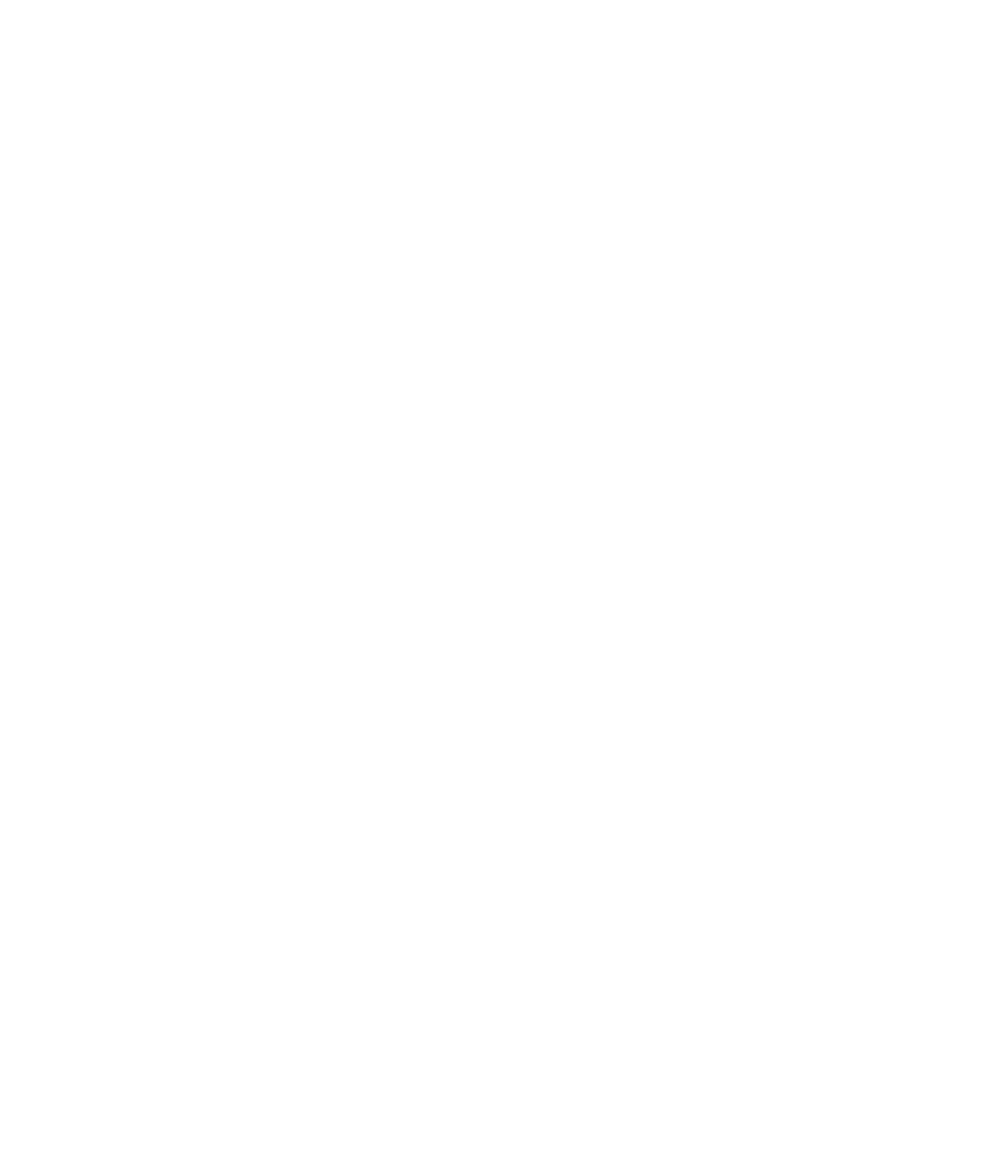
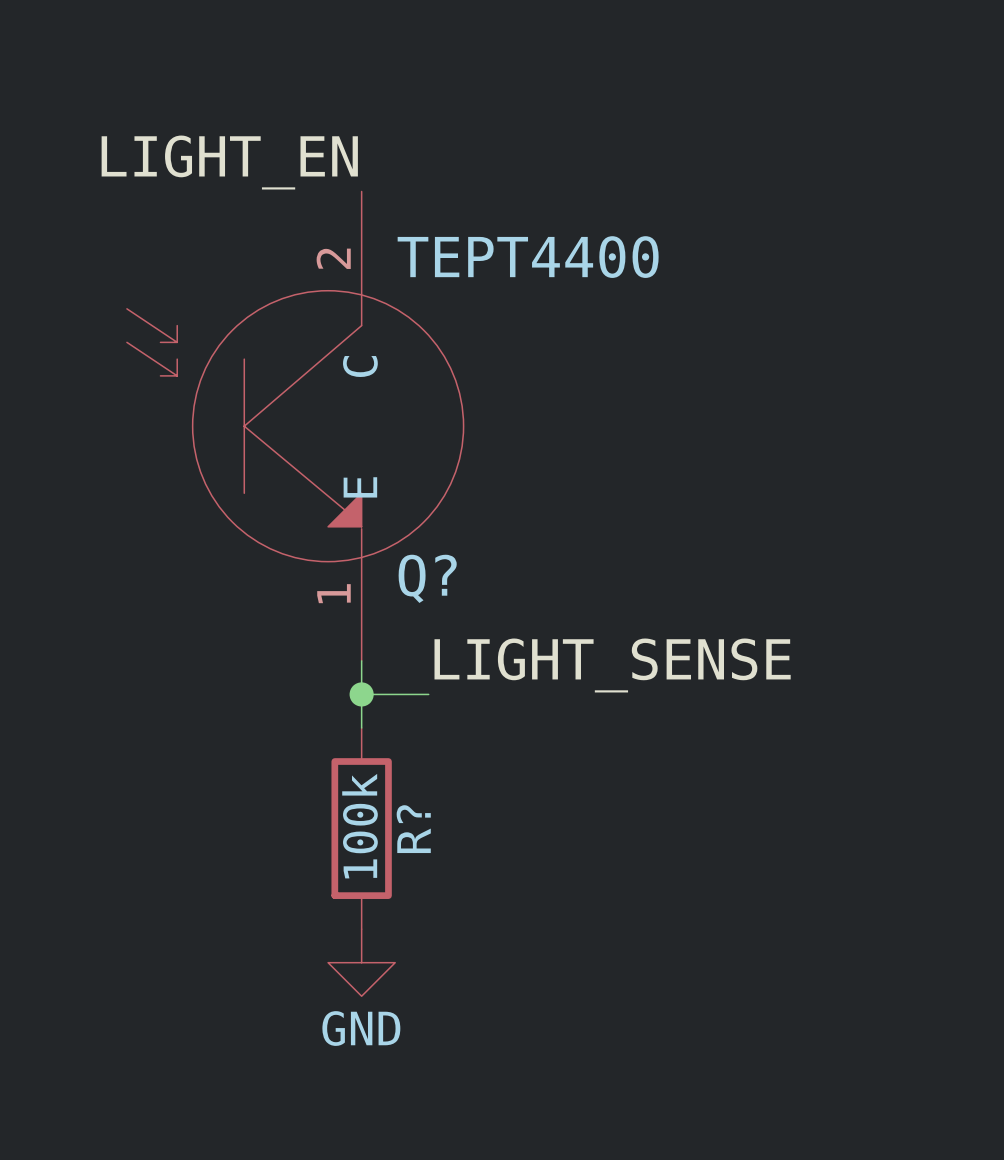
label: none -> LIGHT_EN (229, 162)
Q?: none -> TEPT4400 (295, 426)
wire: none -> (361, 660) (361, 727)
label: none -> LIGHT_SENSE (612, 665)
wire: none -> (361, 694) (428, 694)
junction: none -> (361, 694)
R?: none -> 100k (361, 828)
power symbol: none -> GND (361, 962)

